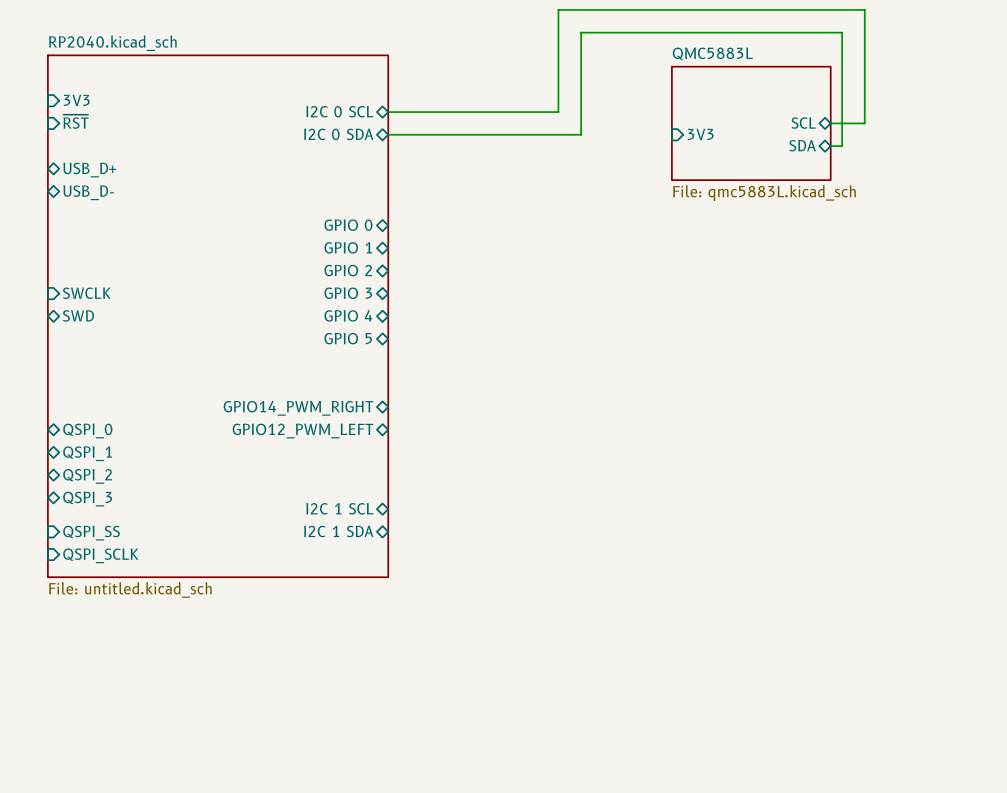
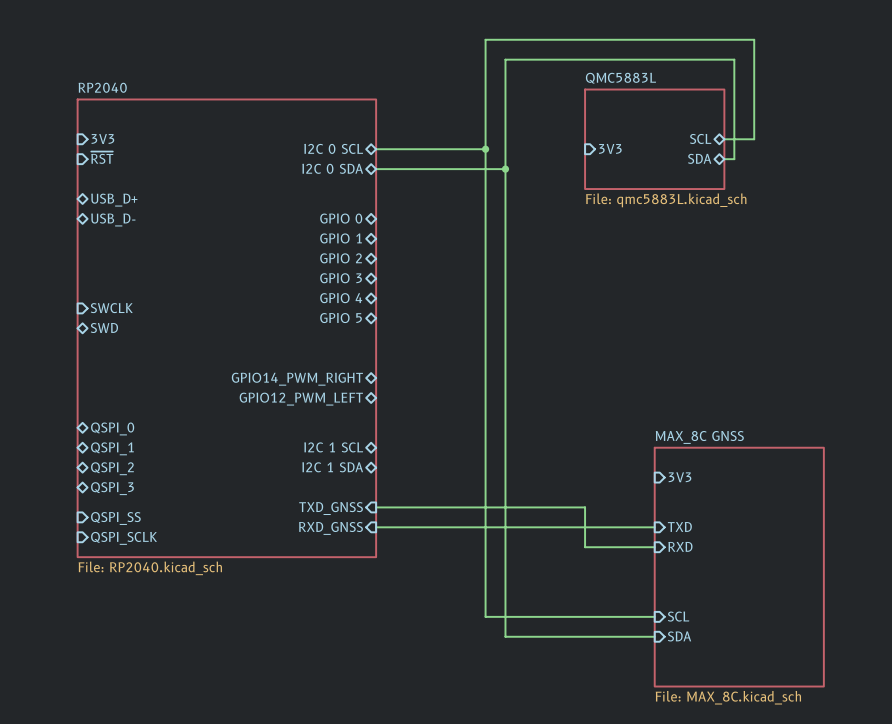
sheet pin position: 3V3 (76, 100) -> 3V3 (102, 138)
sheet pin position: I2C 0 SCL (339, 111) -> I2C 0 SCL (333, 148)
wire: (388, 112) (558, 112) -> (654, 616) (485, 616) (485, 129)
sheet pin position: ~{RST} (75, 121) -> ~{RST} (102, 157)
sheet pin position: I2C 0 SDA (338, 134) -> I2C 0 SDA (332, 168)
wire: (388, 134) (433, 134) -> none
wire: (558, 134) (581, 134) -> (654, 636) (505, 636) (505, 149)
junction: none -> (485, 149)
wire: none -> (376, 169) (505, 169)
junction: none -> (505, 169)
sheet pin position: USB_D+ (89, 170) -> USB_D+ (114, 200)
sheet pin position: USB_D- (88, 192) -> USB_D- (113, 219)
sheet pin position: GPIO 0 (348, 225) -> GPIO 0 (341, 218)
sheet pin position: GPIO 1 (348, 247) -> GPIO 1 (341, 238)
sheet pin position: GPIO 2 (348, 270) -> GPIO 2 (341, 258)
sheet pin position: SWCLK (86, 293) -> SWCLK (111, 308)
sheet pin position: GPIO 3 (348, 293) -> GPIO 3 (341, 278)
sheet pin position: SWD (78, 315) -> SWD (104, 328)
sheet pin position: GPIO 4 (348, 315) -> GPIO 4 (341, 298)
sheet RP2040.kicad_sch: File: untitled.kicad_sch (218, 316) -> none
sheet RP2040: none -> File: RP2040.kicad_sch (226, 328)
sheet pin position: GPIO 5 (348, 338) -> GPIO 5 (341, 318)
sheet pin position: GPIO14_PWM_RIGHT (298, 408) -> GPIO14_PWM_RIGHT (297, 379)
sheet pin position: QSPI_0 (87, 431) -> QSPI_0 (112, 428)
sheet pin position: GPIO12_PWM_LEFT (302, 431) -> GPIO12_PWM_LEFT (301, 399)
sheet pin position: QSPI_1 (87, 453) -> QSPI_1 (112, 448)
sheet pin position: QSPI_2 (87, 476) -> QSPI_2 (112, 468)
sheet pin position: QSPI_3 (87, 499) -> QSPI_3 (112, 488)
sheet pin position: I2C 1 SCL (339, 508) -> I2C 1 SCL (333, 447)
sheet pin: none -> 3V3 (679, 477)
sheet pin position: I2C 1 SDA (338, 531) -> I2C 1 SDA (332, 467)
sheet pin position: QSPI_SS (91, 533) -> QSPI_SS (115, 518)
wire: none -> (376, 507) (585, 507) (585, 547) (654, 547)
sheet pin: none -> TXD_GNSS (331, 508)
sheet pin position: QSPI_SCLK (100, 555) -> QSPI_SCLK (124, 538)
wire: none -> (376, 527) (654, 527)
sheet pin: none -> TXD (679, 526)
sheet pin: none -> RXD_GNSS (330, 528)
sheet pin: none -> RXD (680, 546)
sheet MAX_8C GNSS: none -> File: MAX_8C.kicad_sch (739, 567)
sheet pin: none -> SCL (678, 616)
sheet pin: none -> SDA (679, 636)

